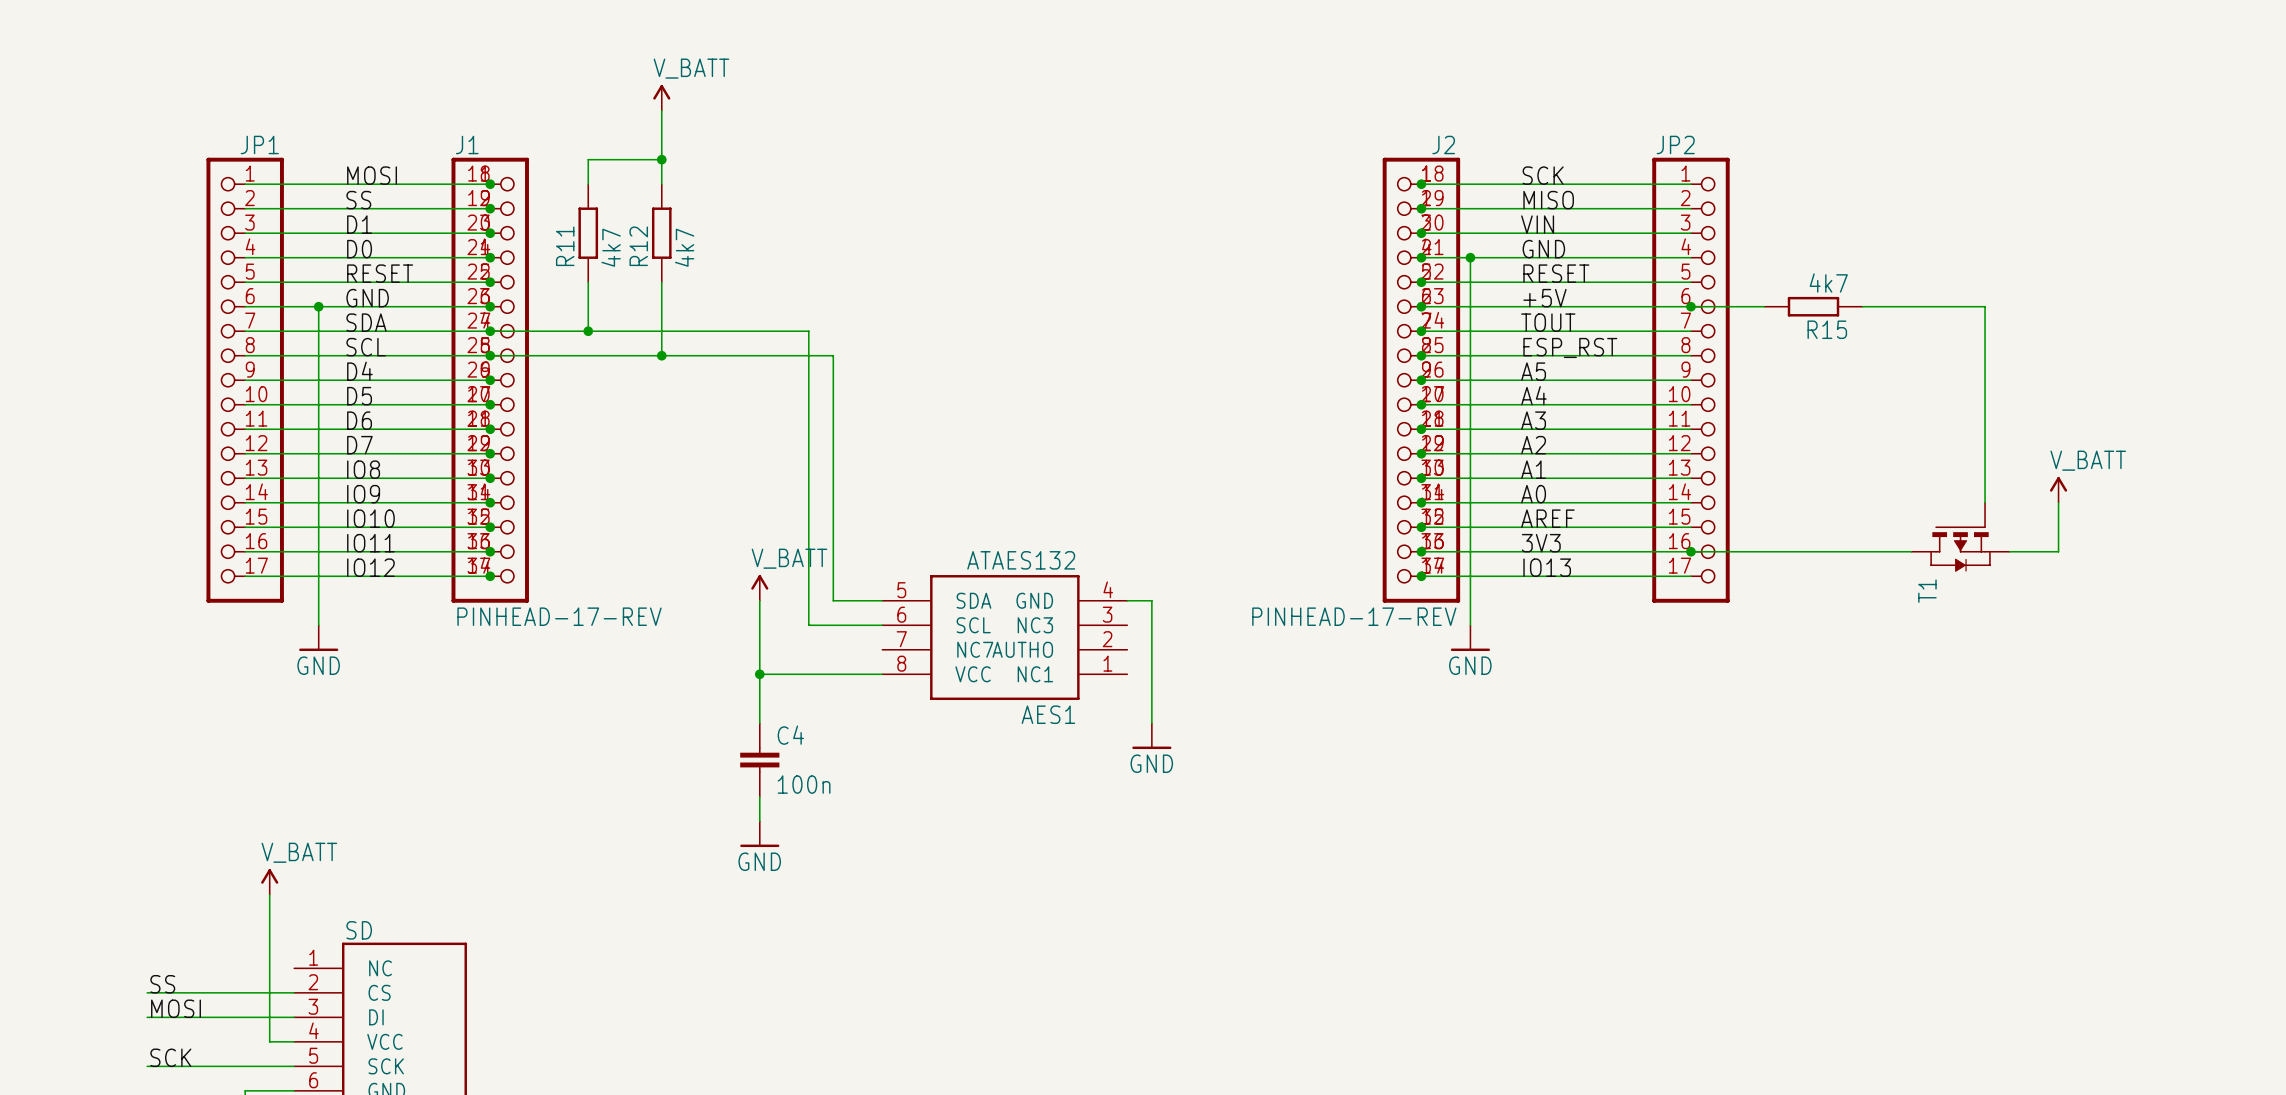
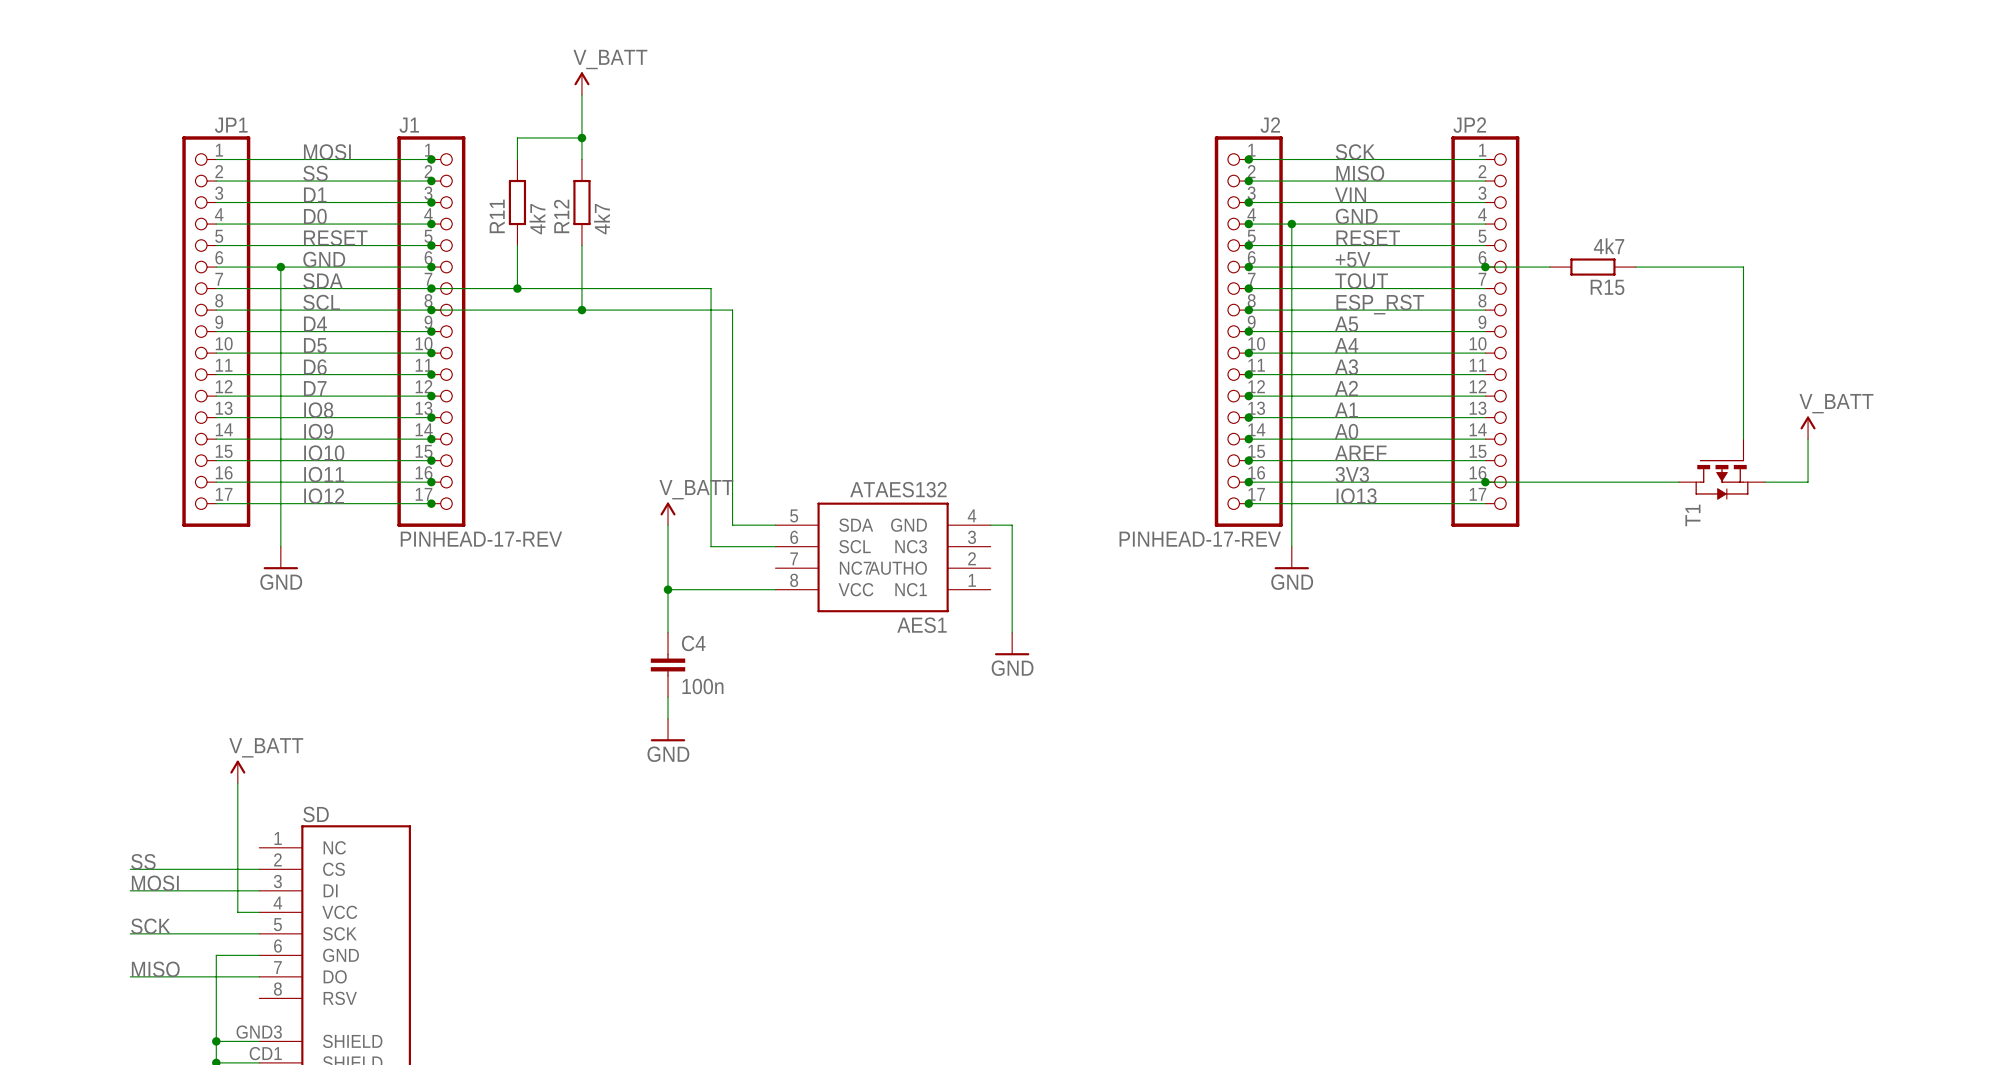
J1 symbol: [451, 157, 529, 603] -> [397, 136, 466, 527]
J2 symbol: [1382, 157, 1461, 603] -> [1214, 136, 1283, 527]

